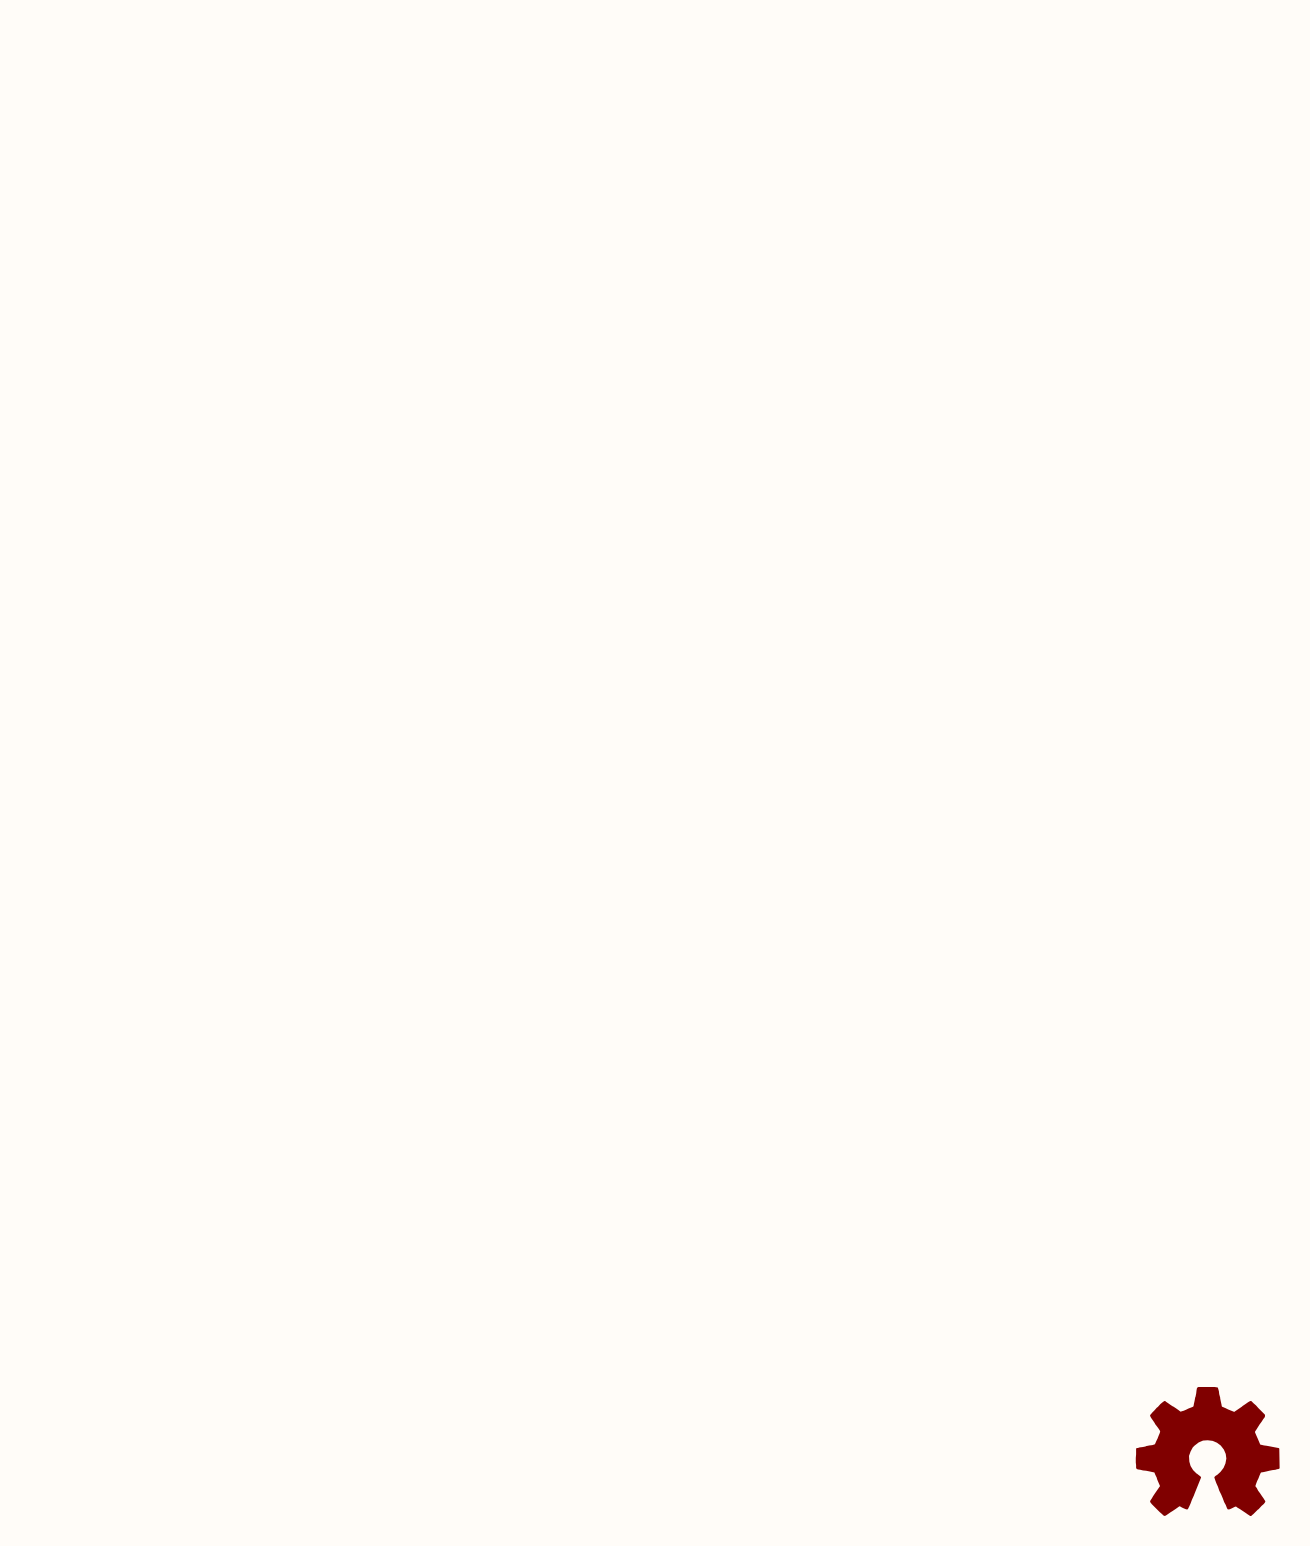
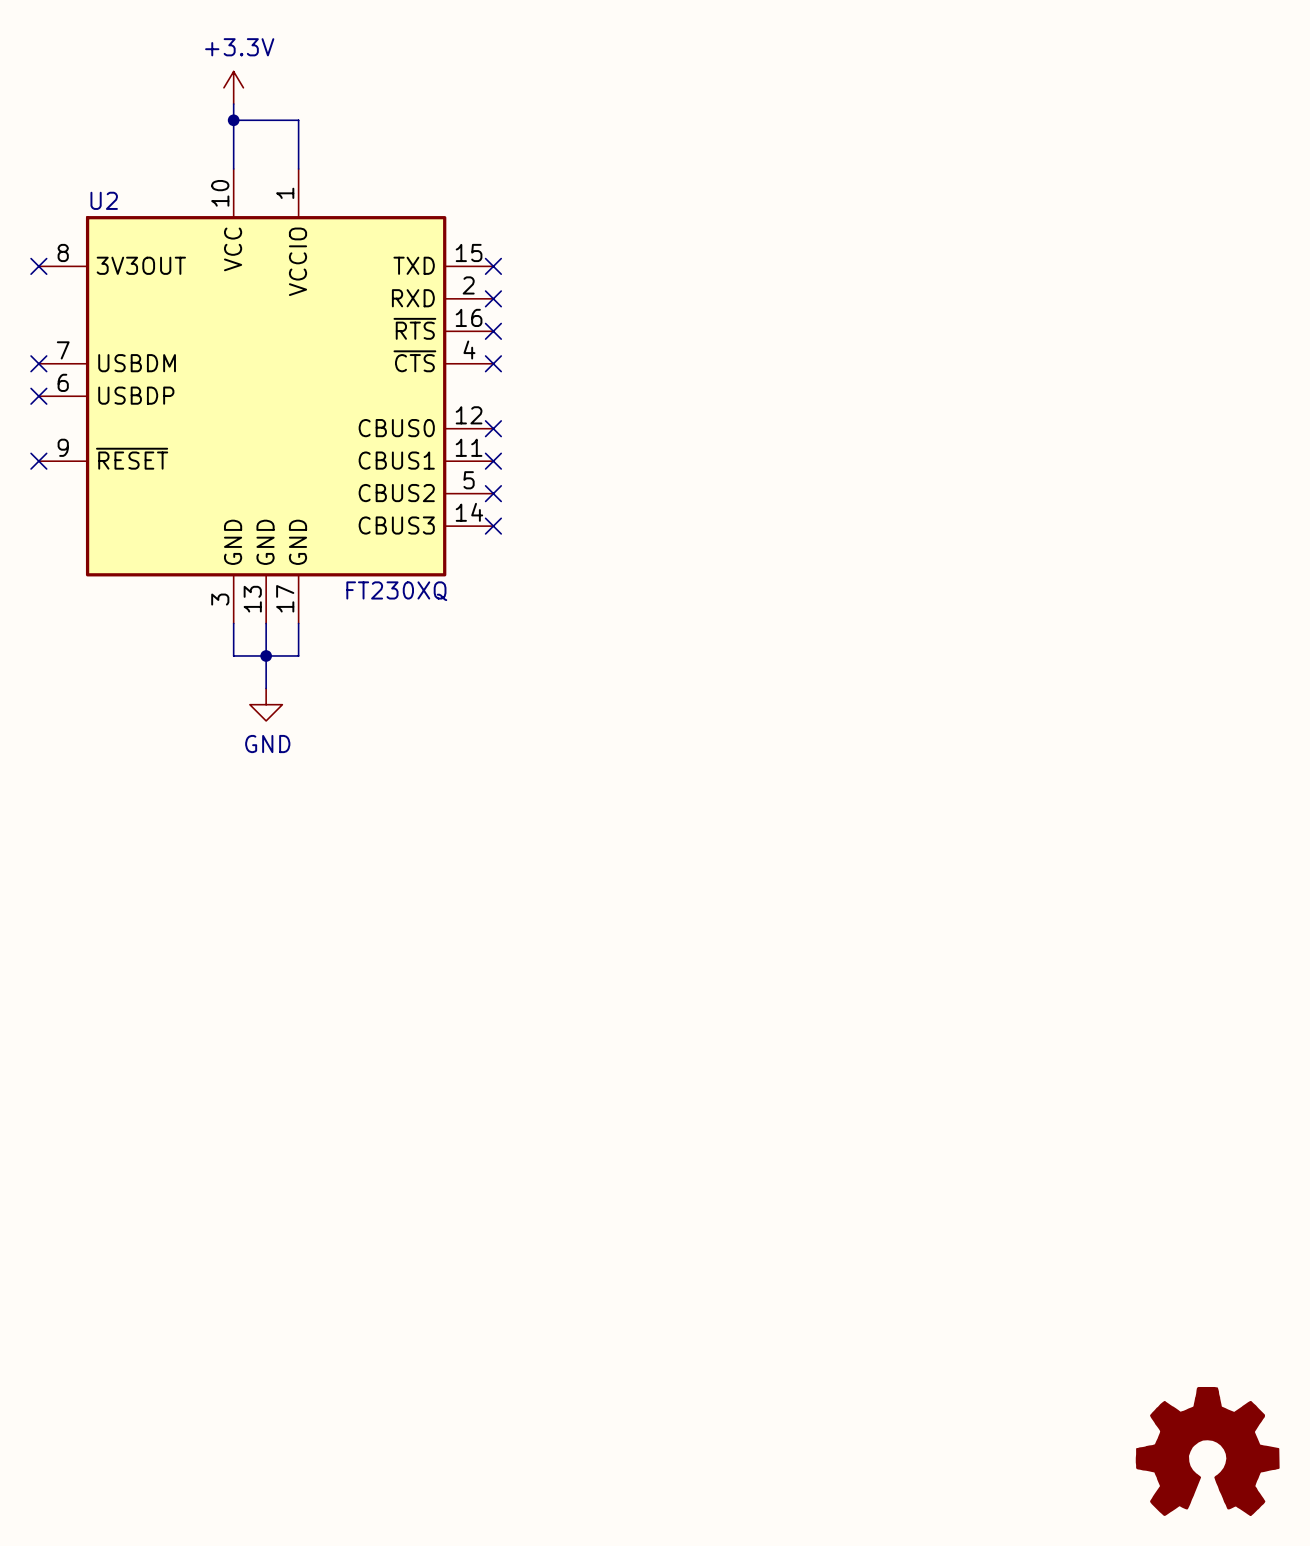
power symbol: none -> +3.3V (233, 87)
wire: none -> (233, 104) (233, 168)
wire: none -> (233, 120) (298, 120) (298, 168)
junction: none -> (233, 120)
no-connect mark: none -> (38, 266)
no-connect mark: none -> (493, 266)
no-connect mark: none -> (493, 298)
no-connect mark: none -> (493, 331)
no-connect mark: none -> (38, 363)
no-connect mark: none -> (493, 363)
no-connect mark: none -> (38, 396)
U2: none -> FT230XQ (266, 396)
no-connect mark: none -> (493, 428)
no-connect mark: none -> (38, 461)
no-connect mark: none -> (493, 461)
no-connect mark: none -> (493, 493)
no-connect mark: none -> (493, 526)
wire: none -> (233, 623) (233, 655) (298, 655) (298, 623)
wire: none -> (266, 623) (266, 688)
junction: none -> (266, 655)
power symbol: none -> GND (266, 704)

